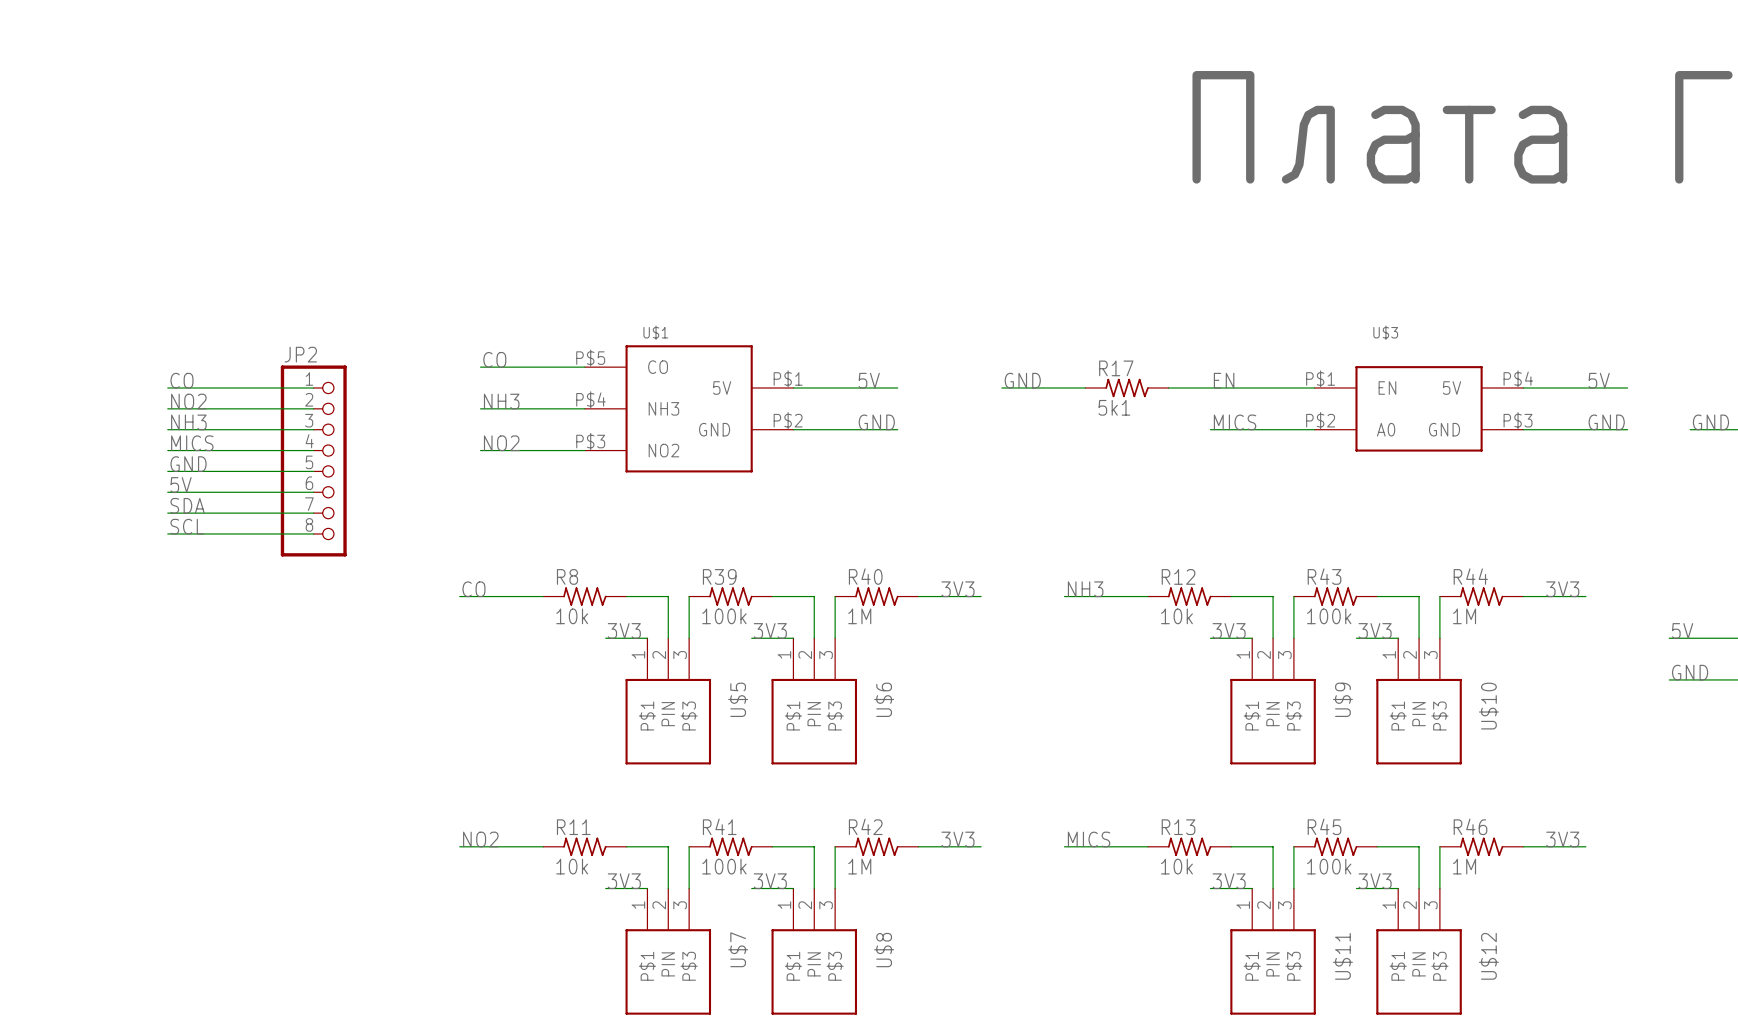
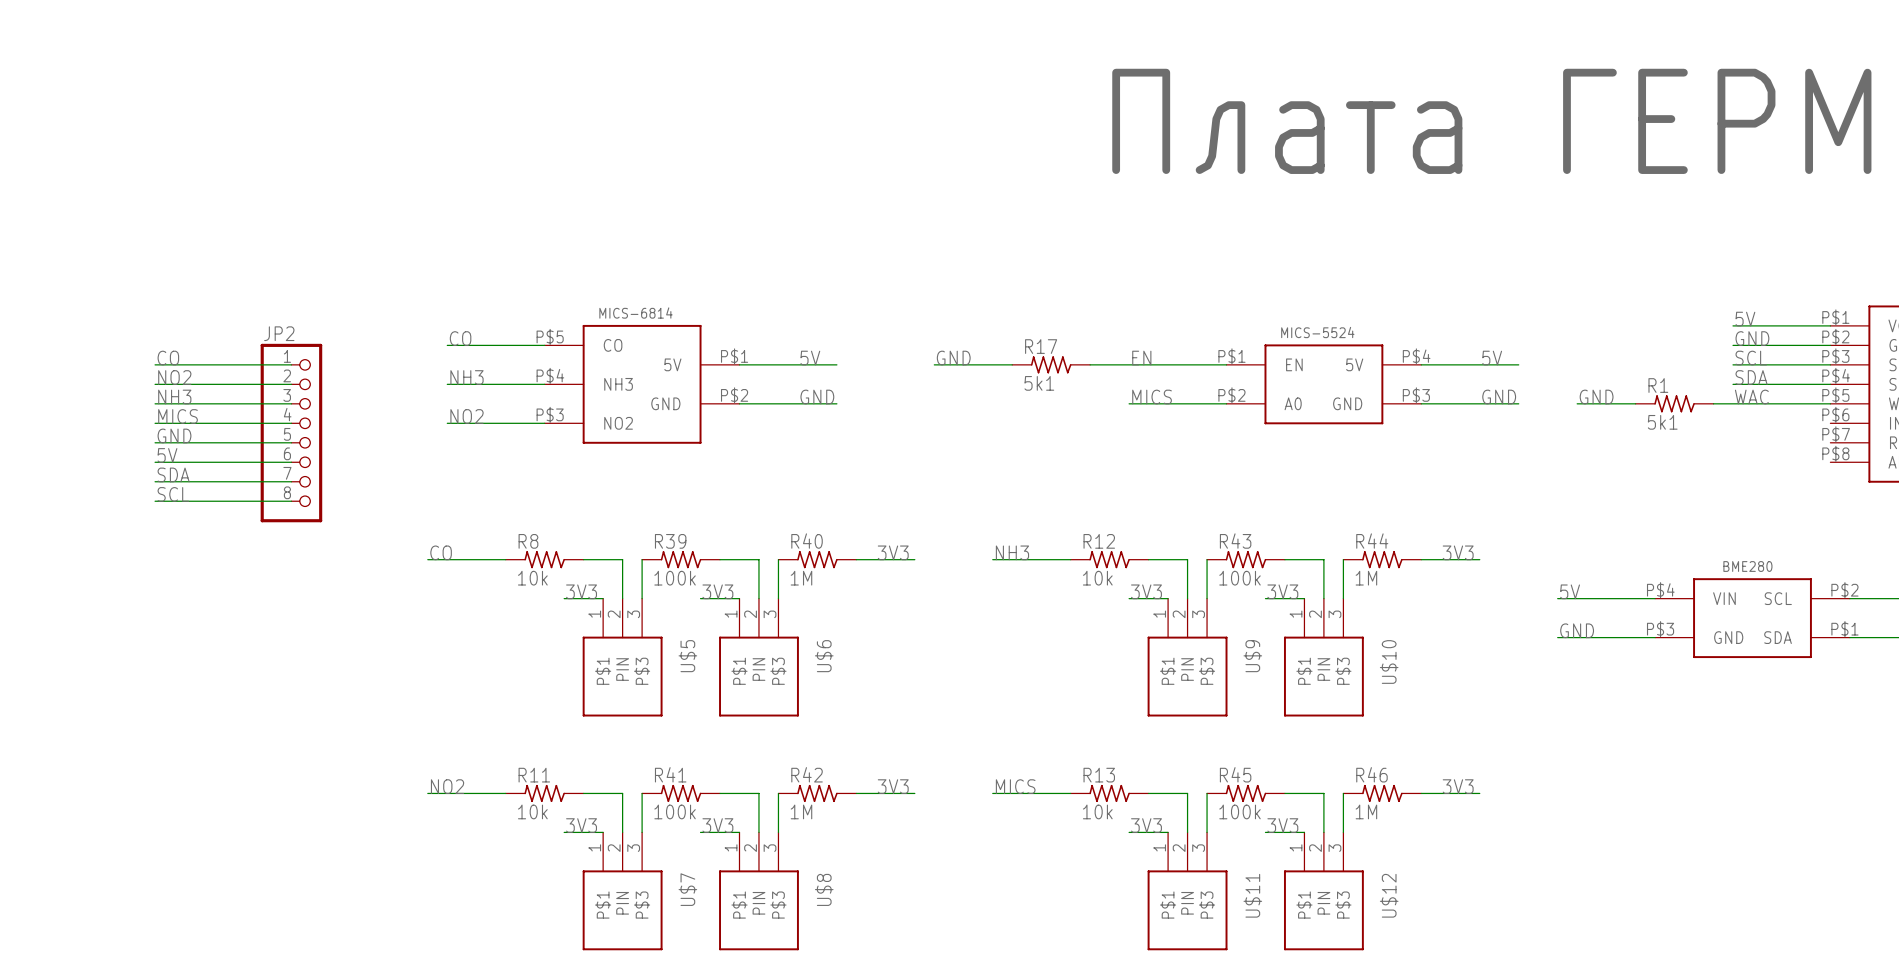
U$1 name: U$1 (655, 332) -> MICS-6814 (636, 313)
U$3 name: U$3 (1385, 332) -> MICS-5524 (1317, 332)

